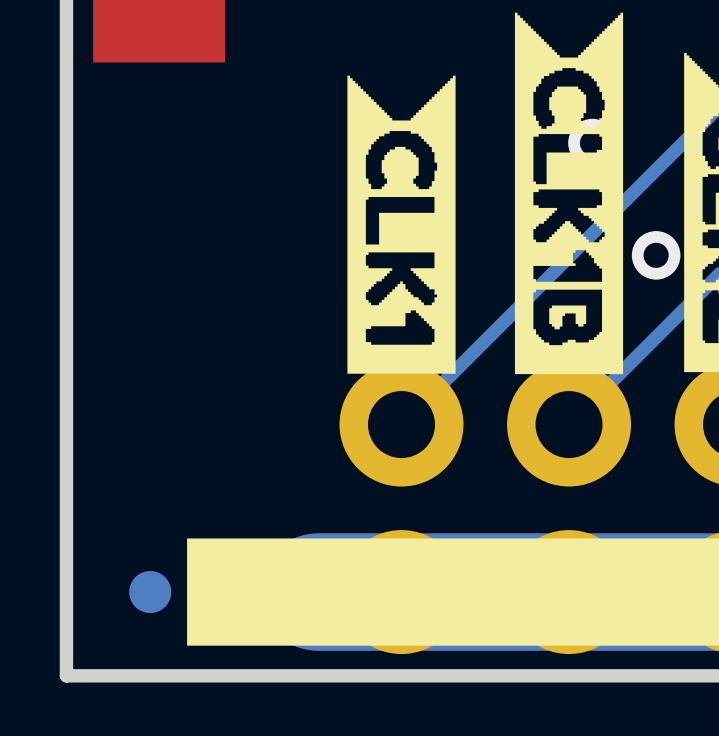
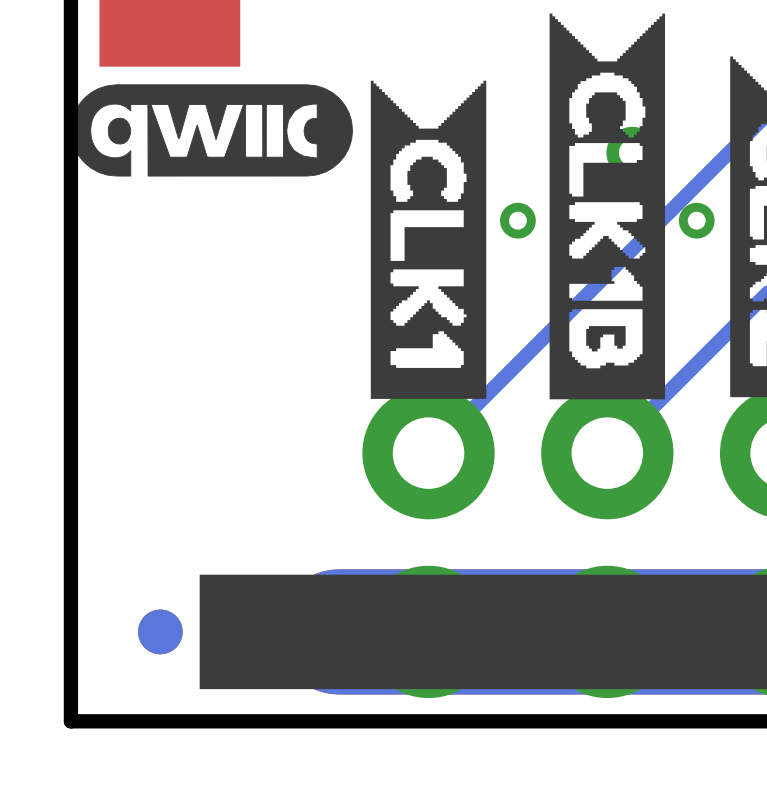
drawing: none -> [70, 84, 353, 177]
via: none -> (517, 220)
via: none -> (696, 220)
via: (656, 255) -> none

